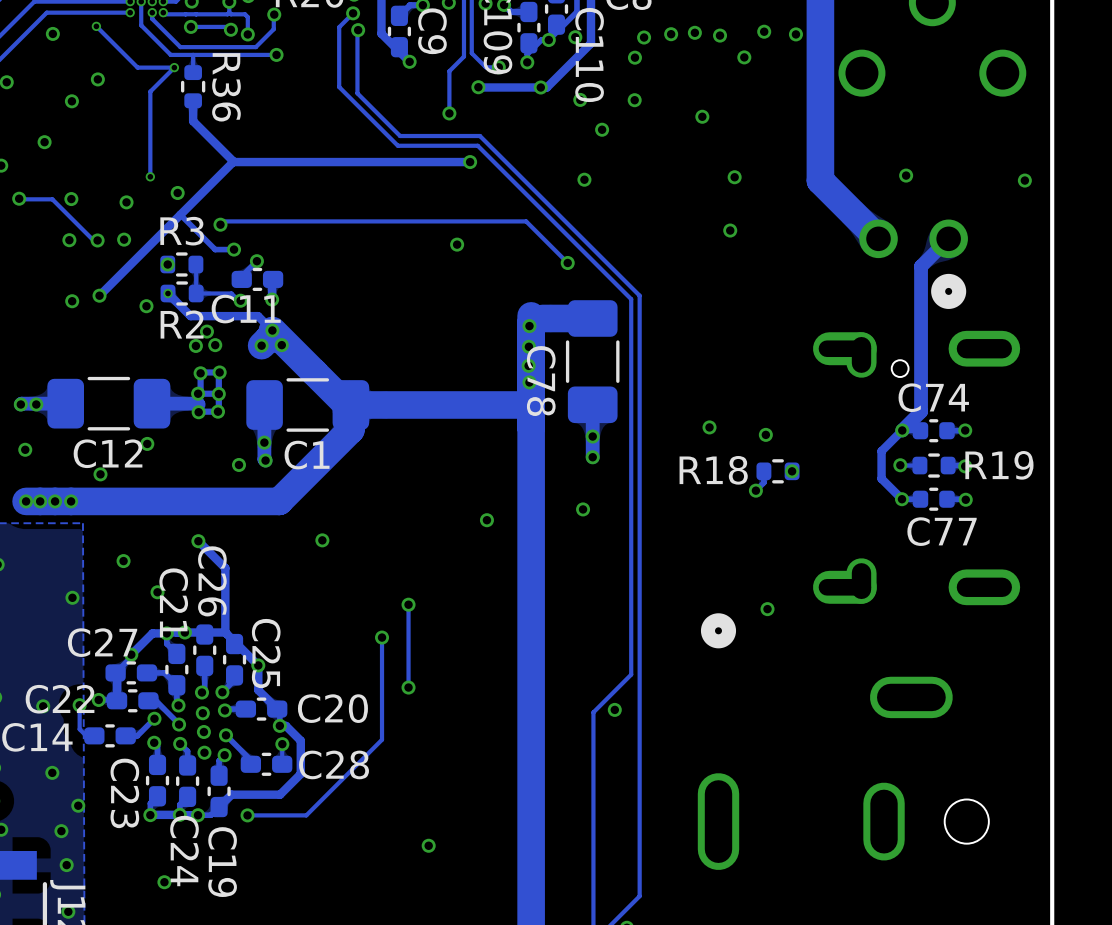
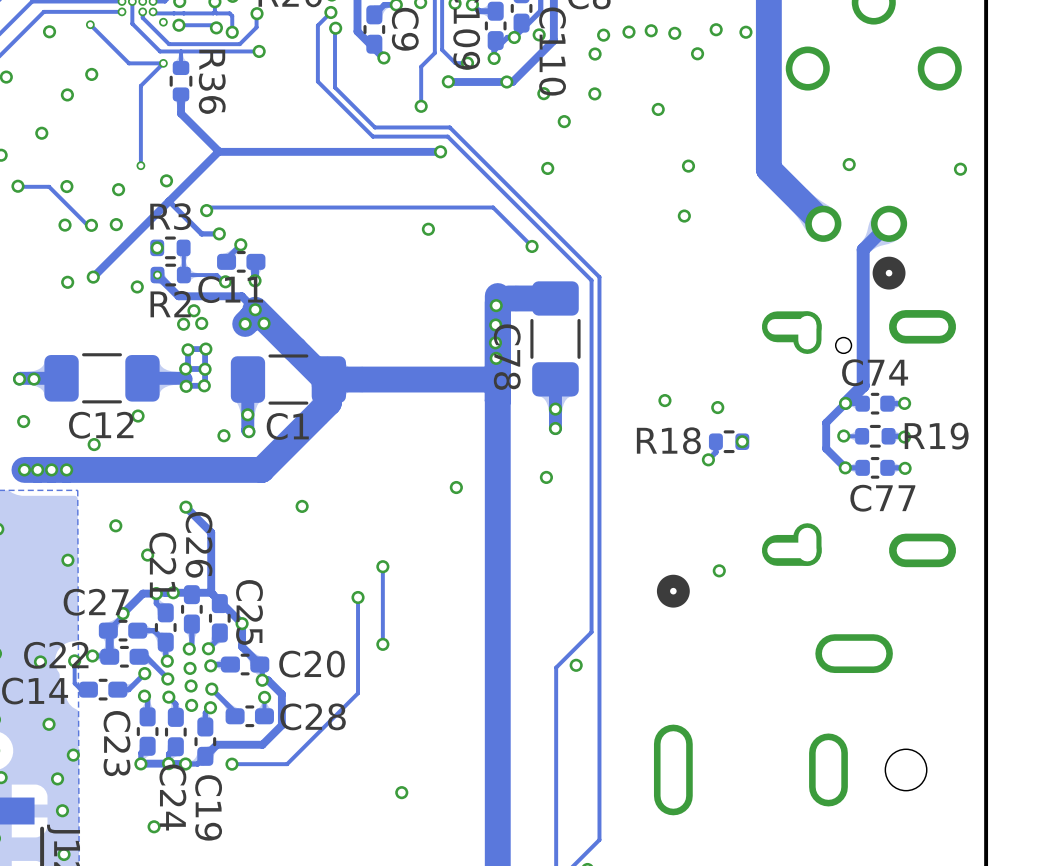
via: none -> (163, 22)

